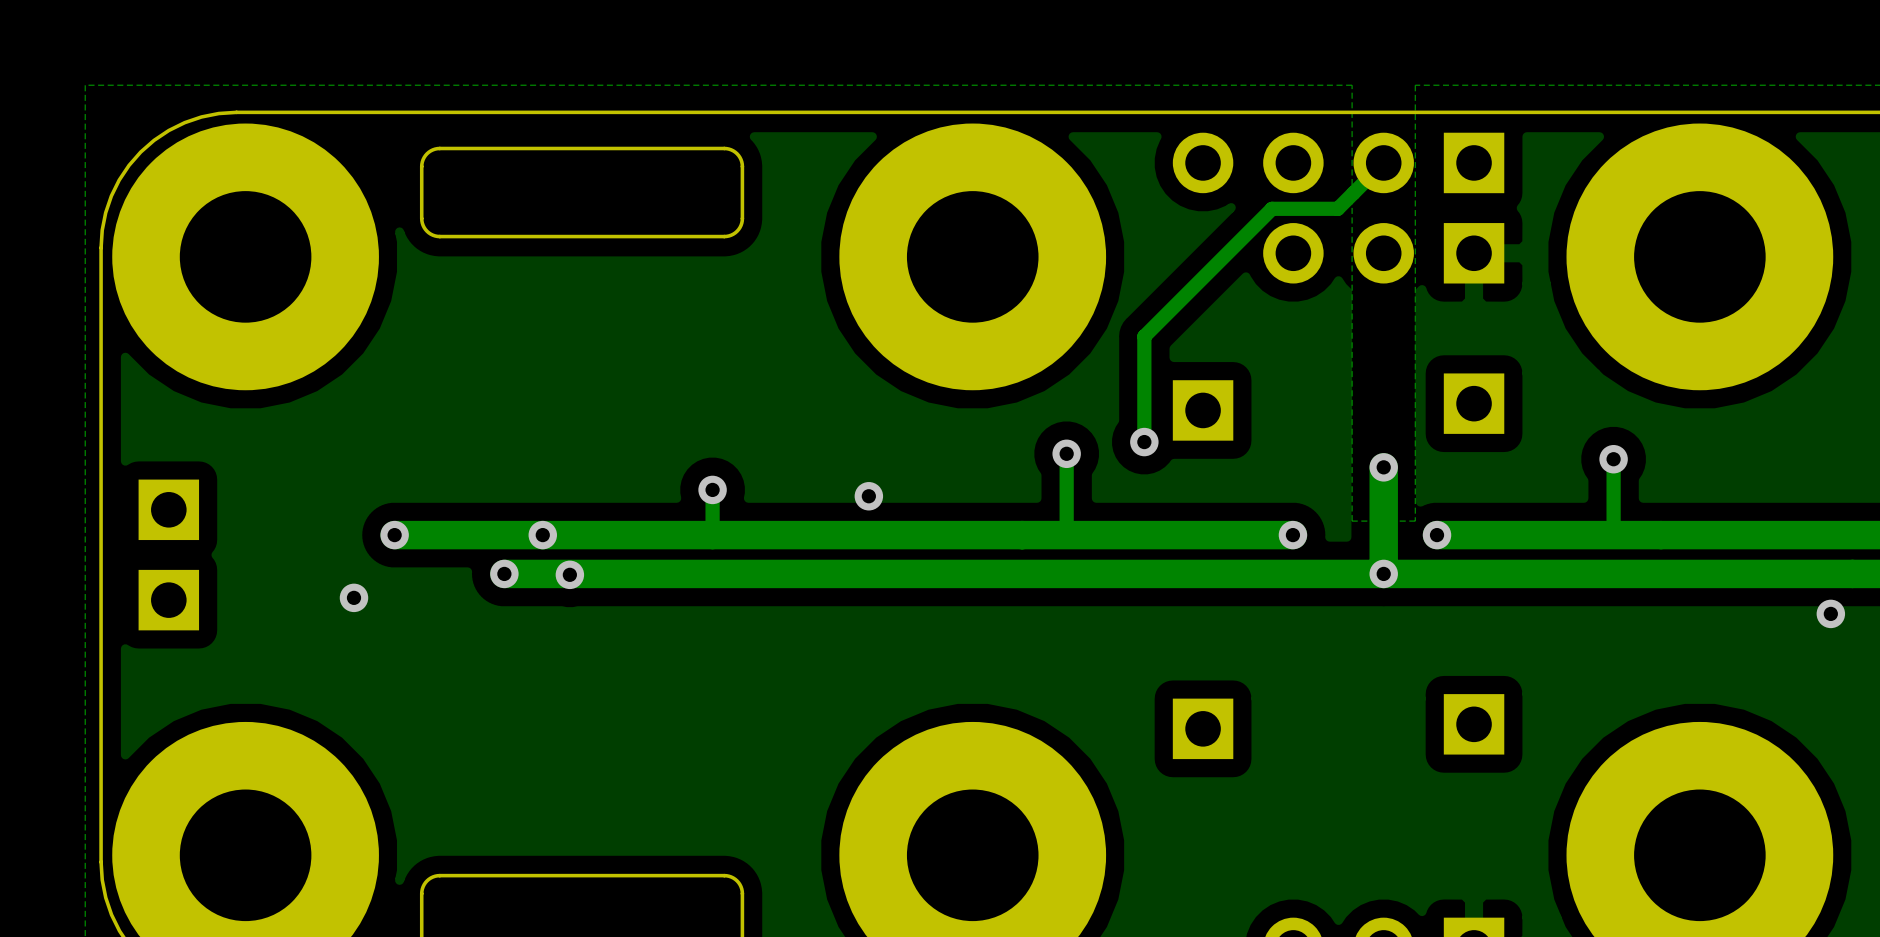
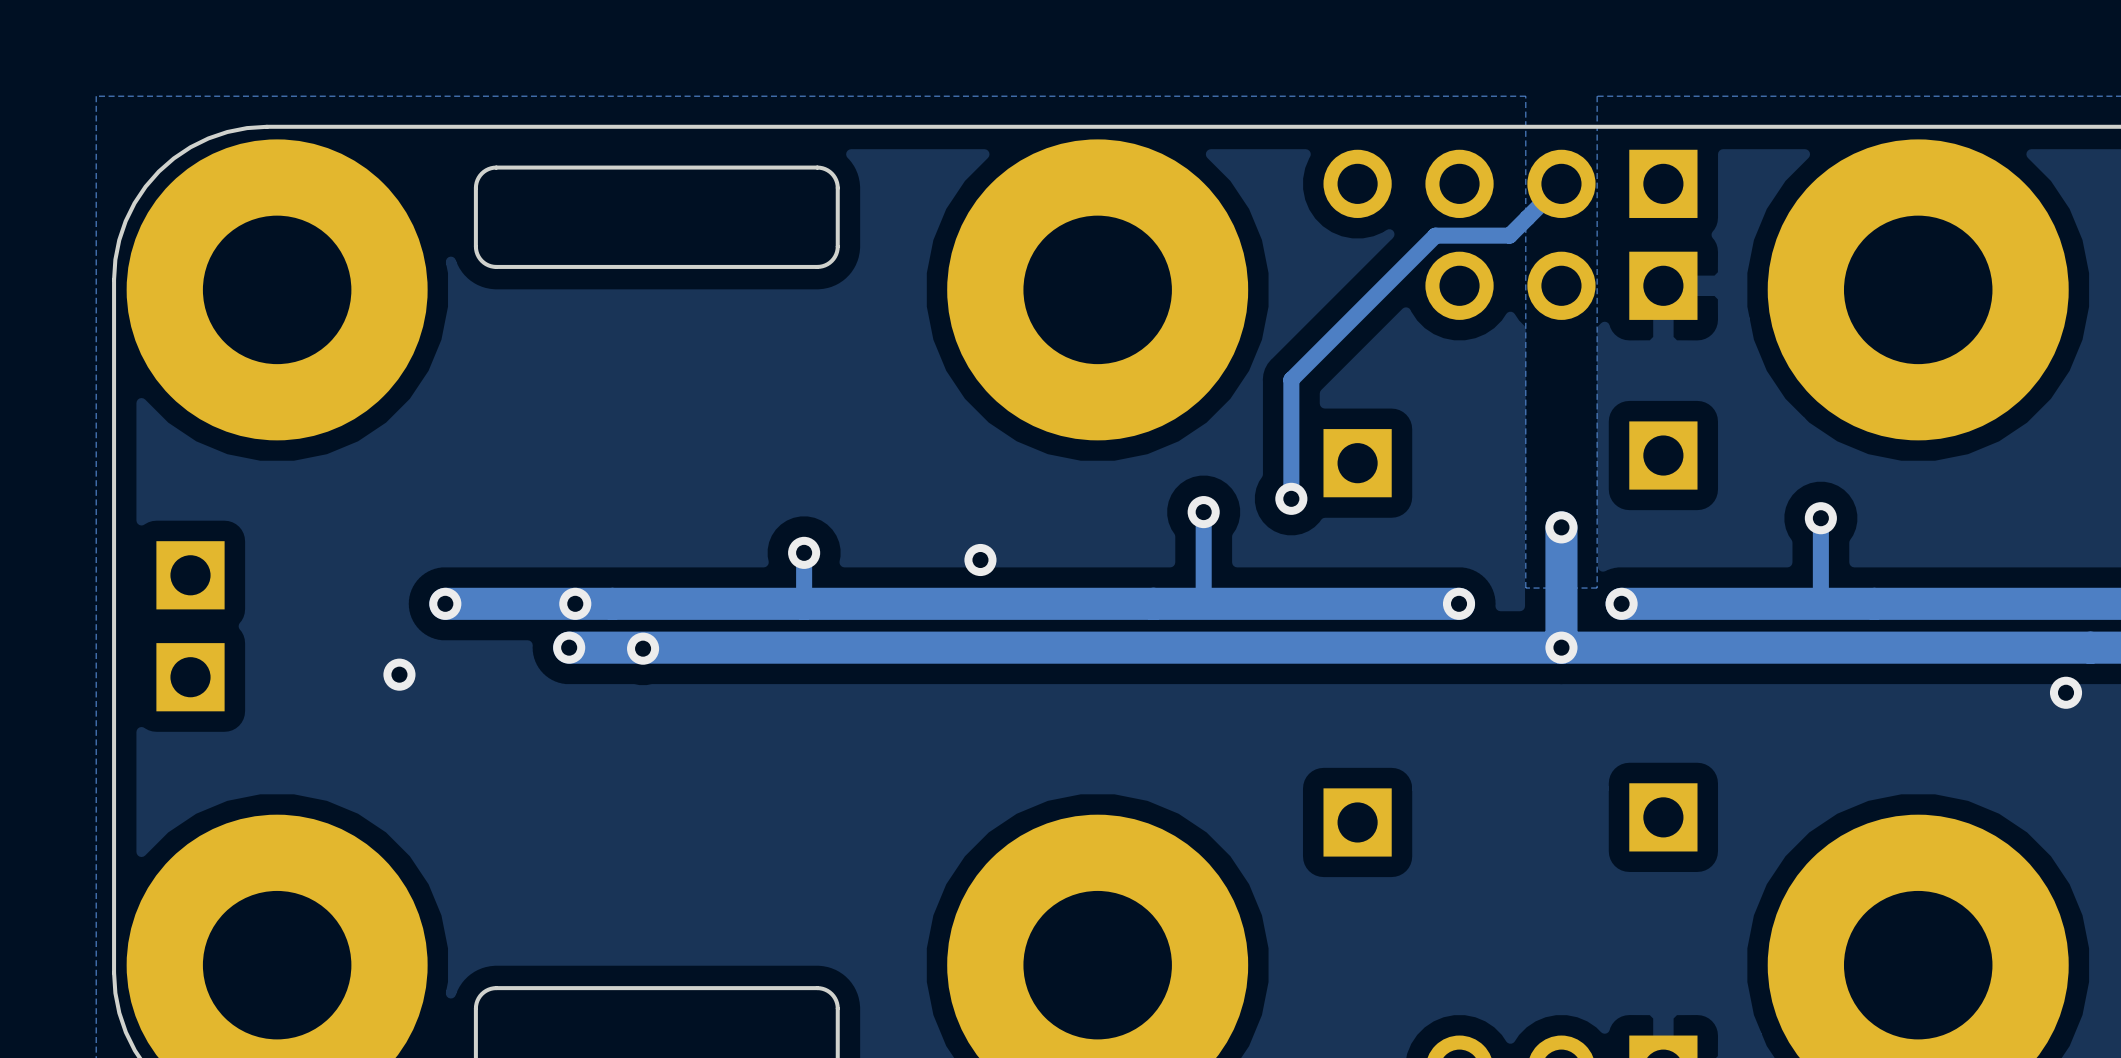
via position: (542, 535) -> (575, 603)

